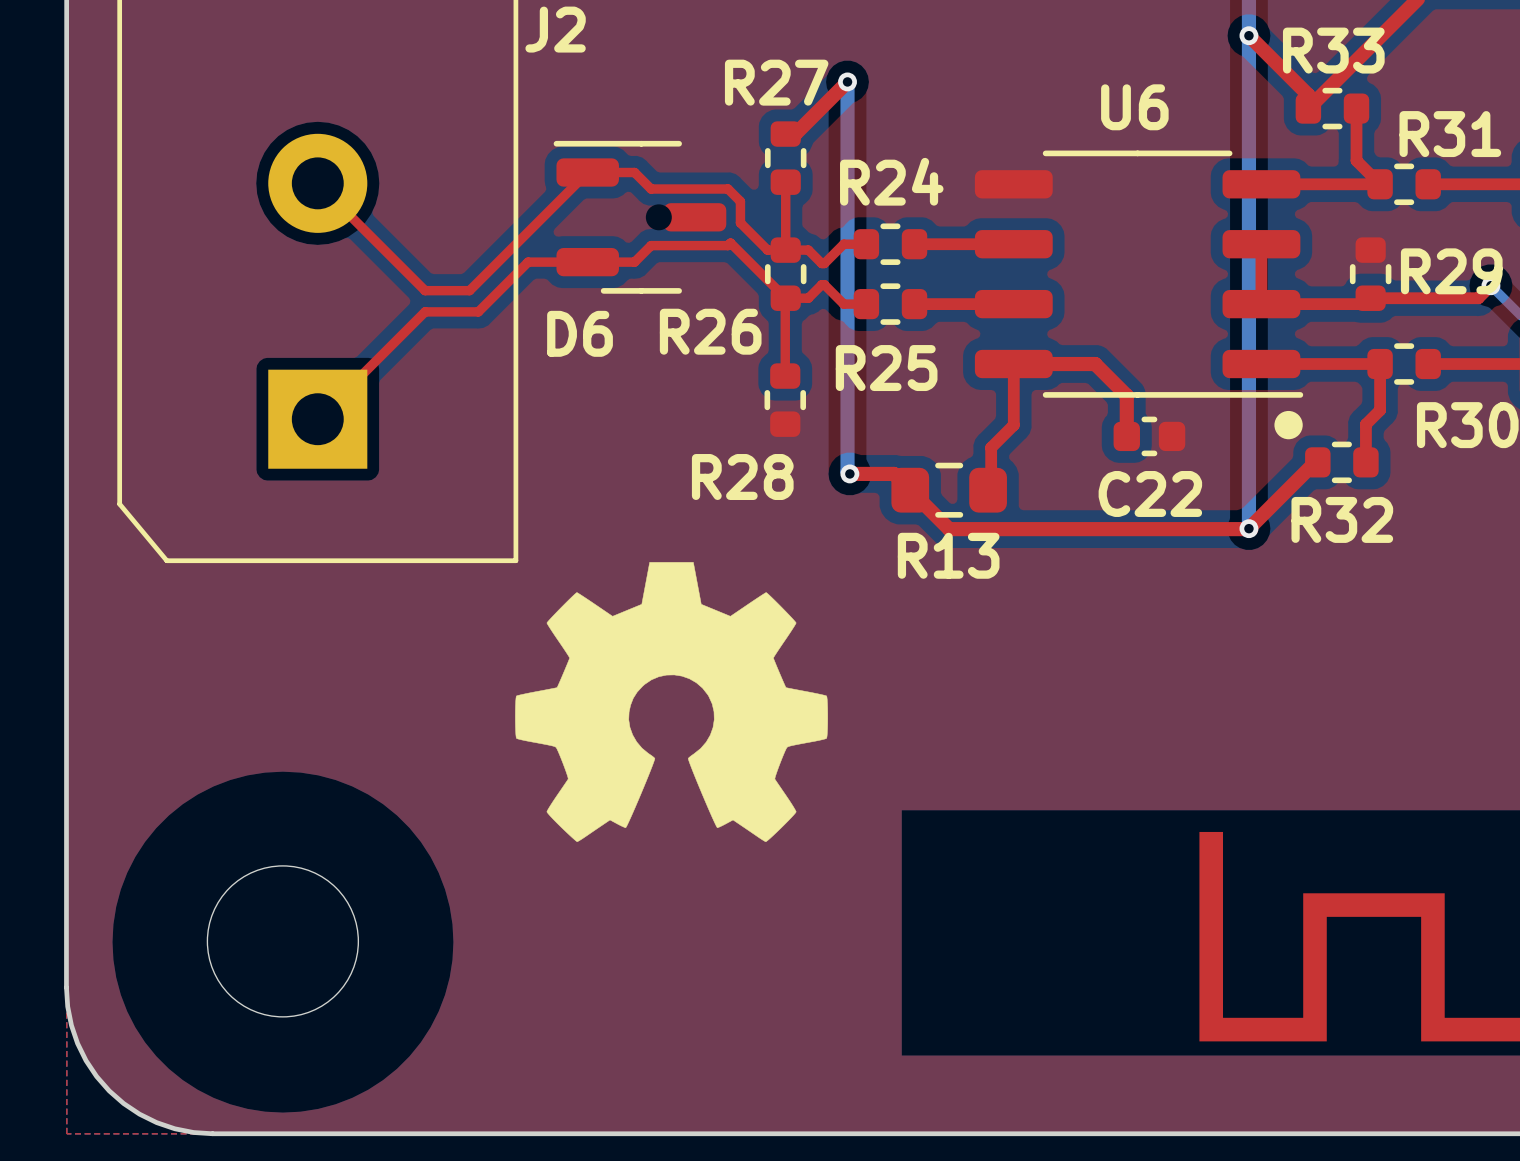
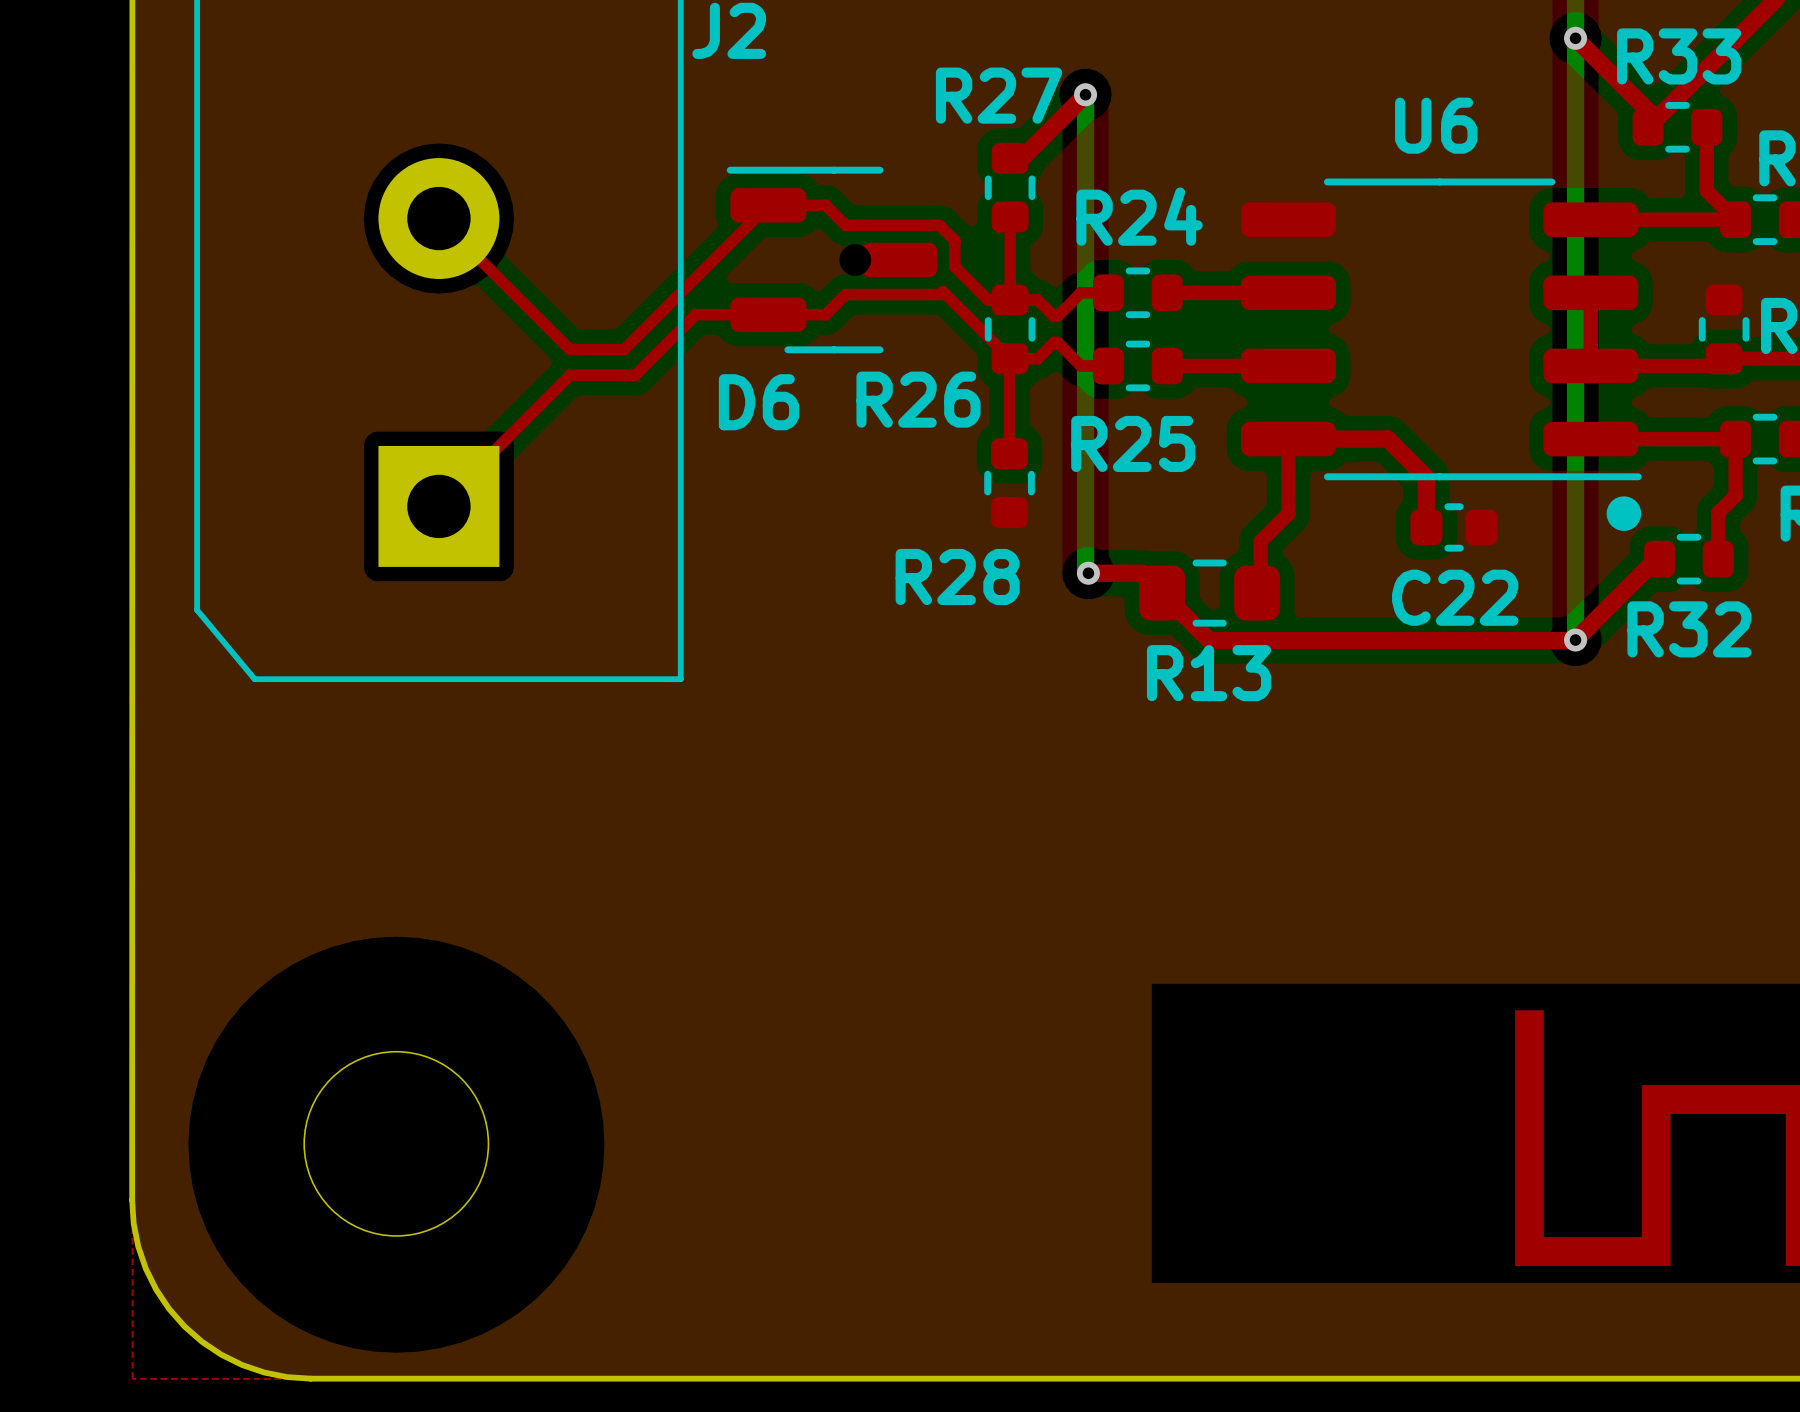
drawing: [515, 562, 828, 843] -> none

